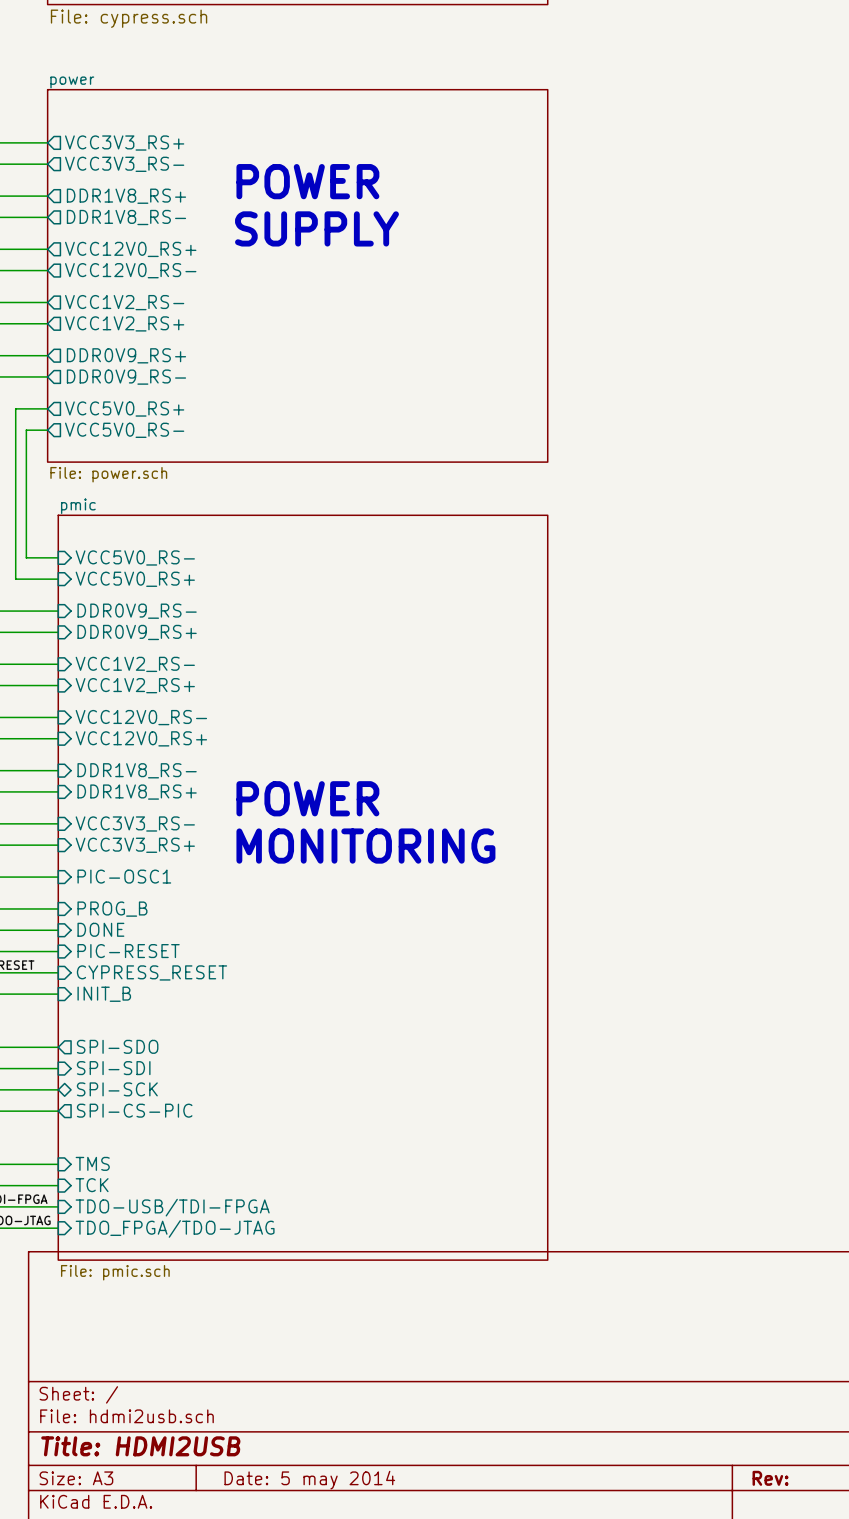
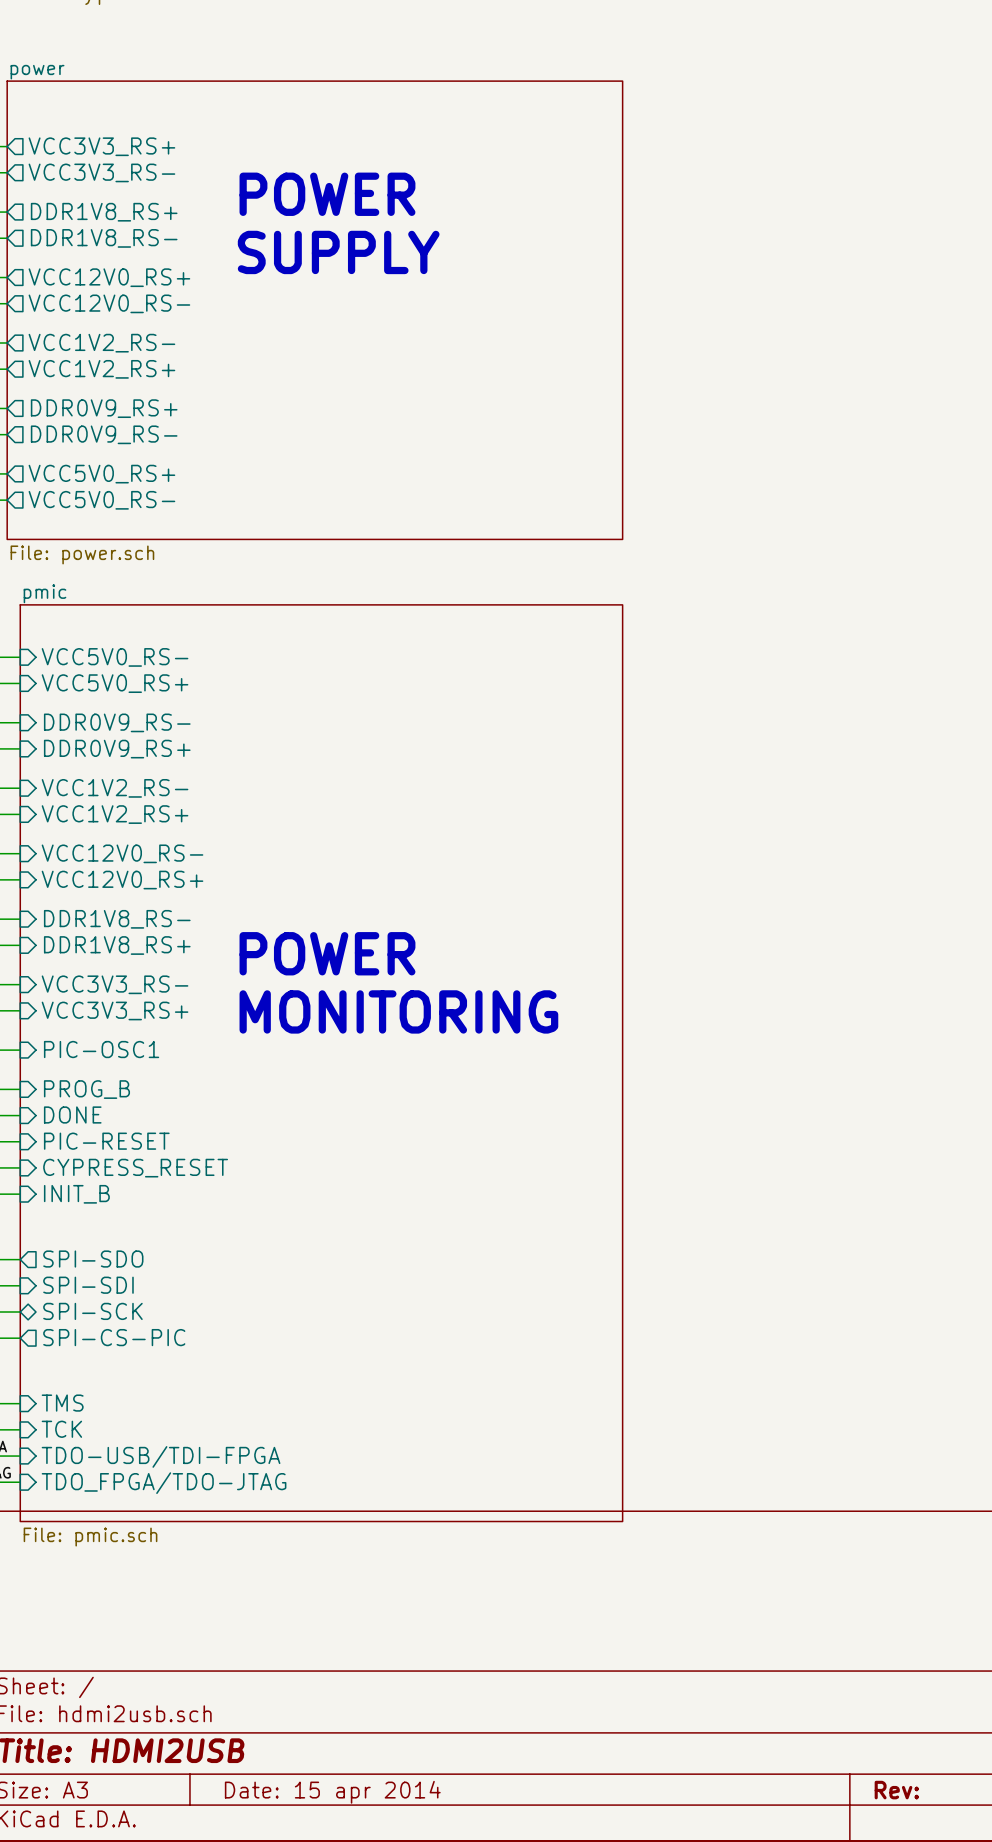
title block: Date: 5 may 2014 (309, 1480) -> Date: 15 apr 2014 (332, 1792)

